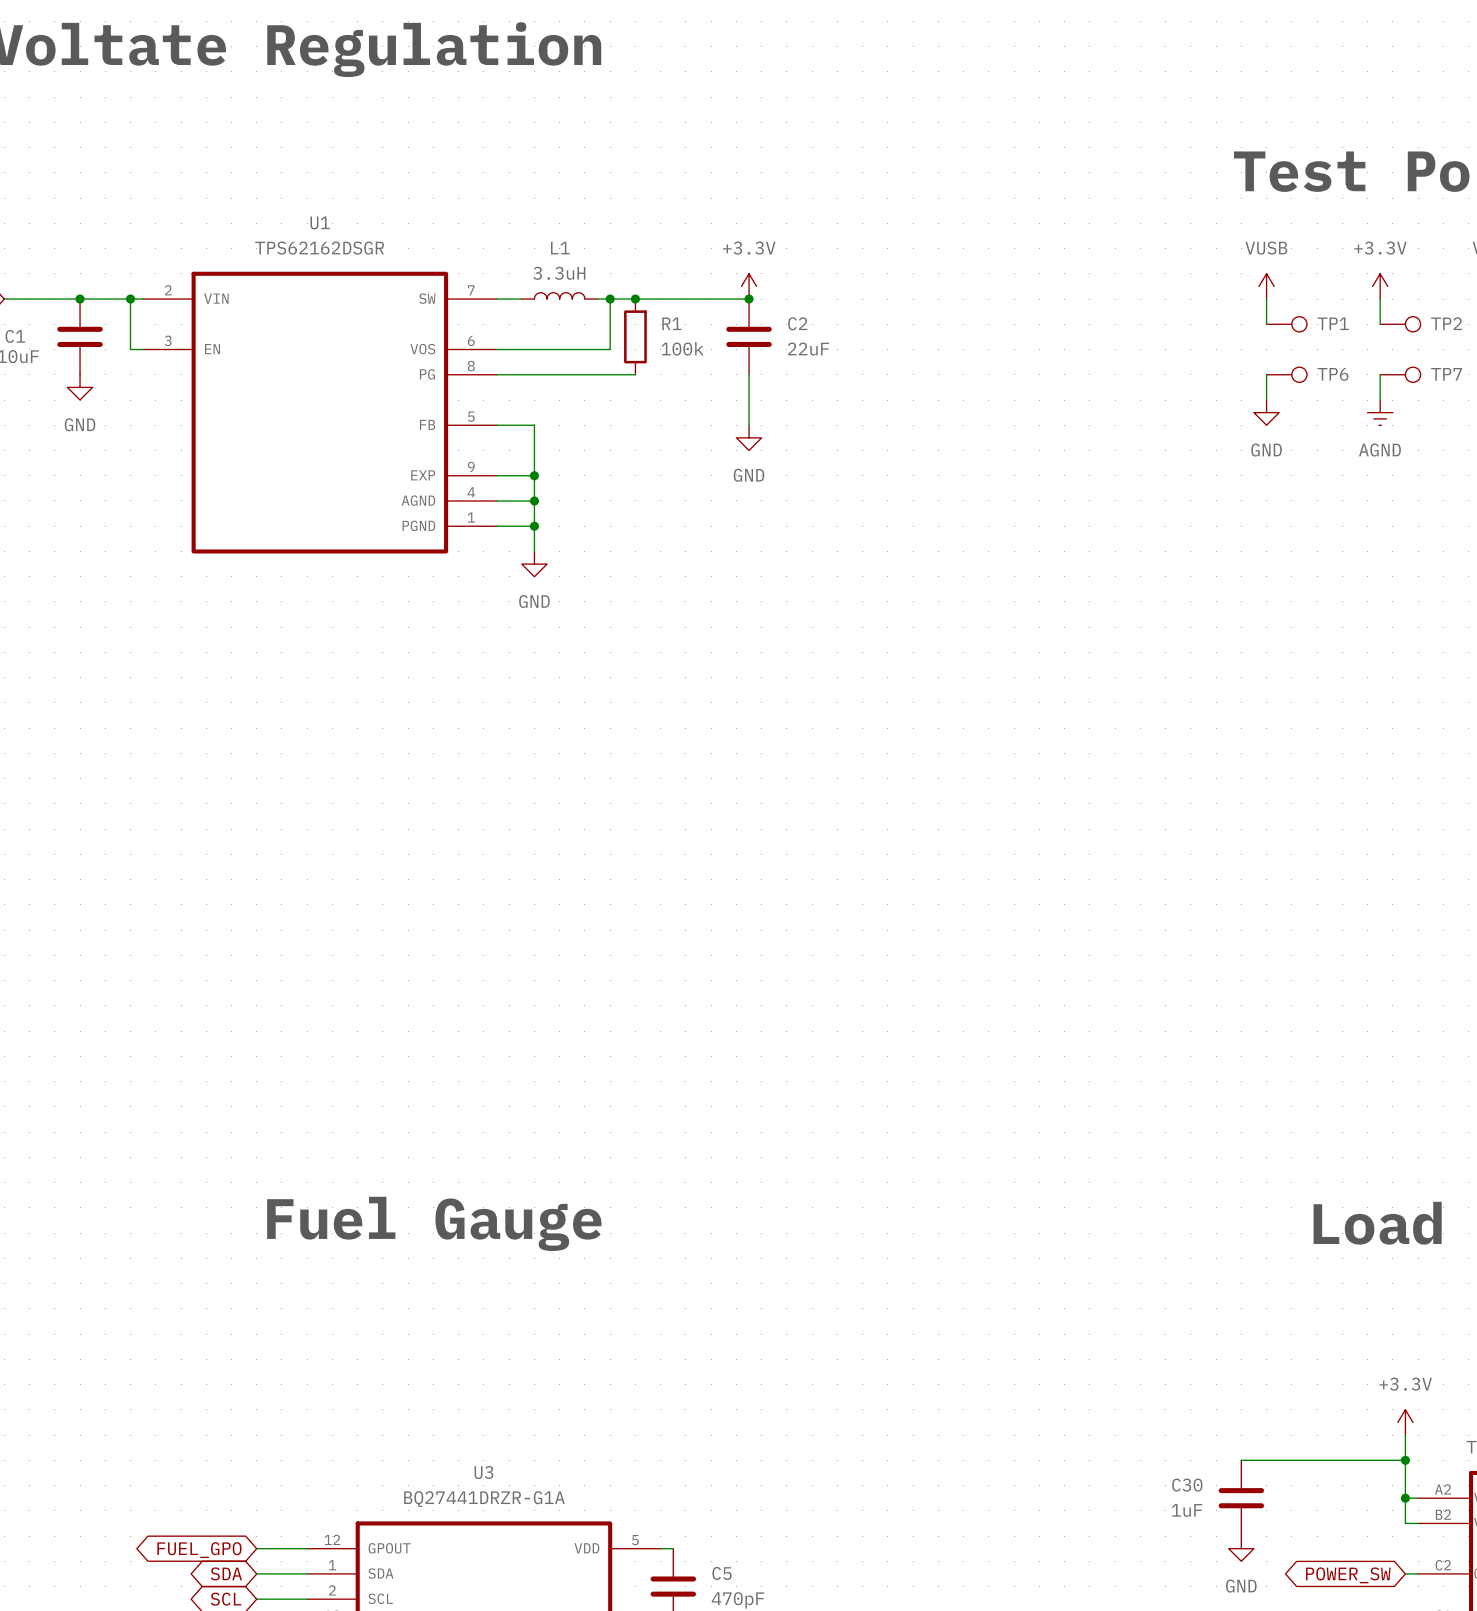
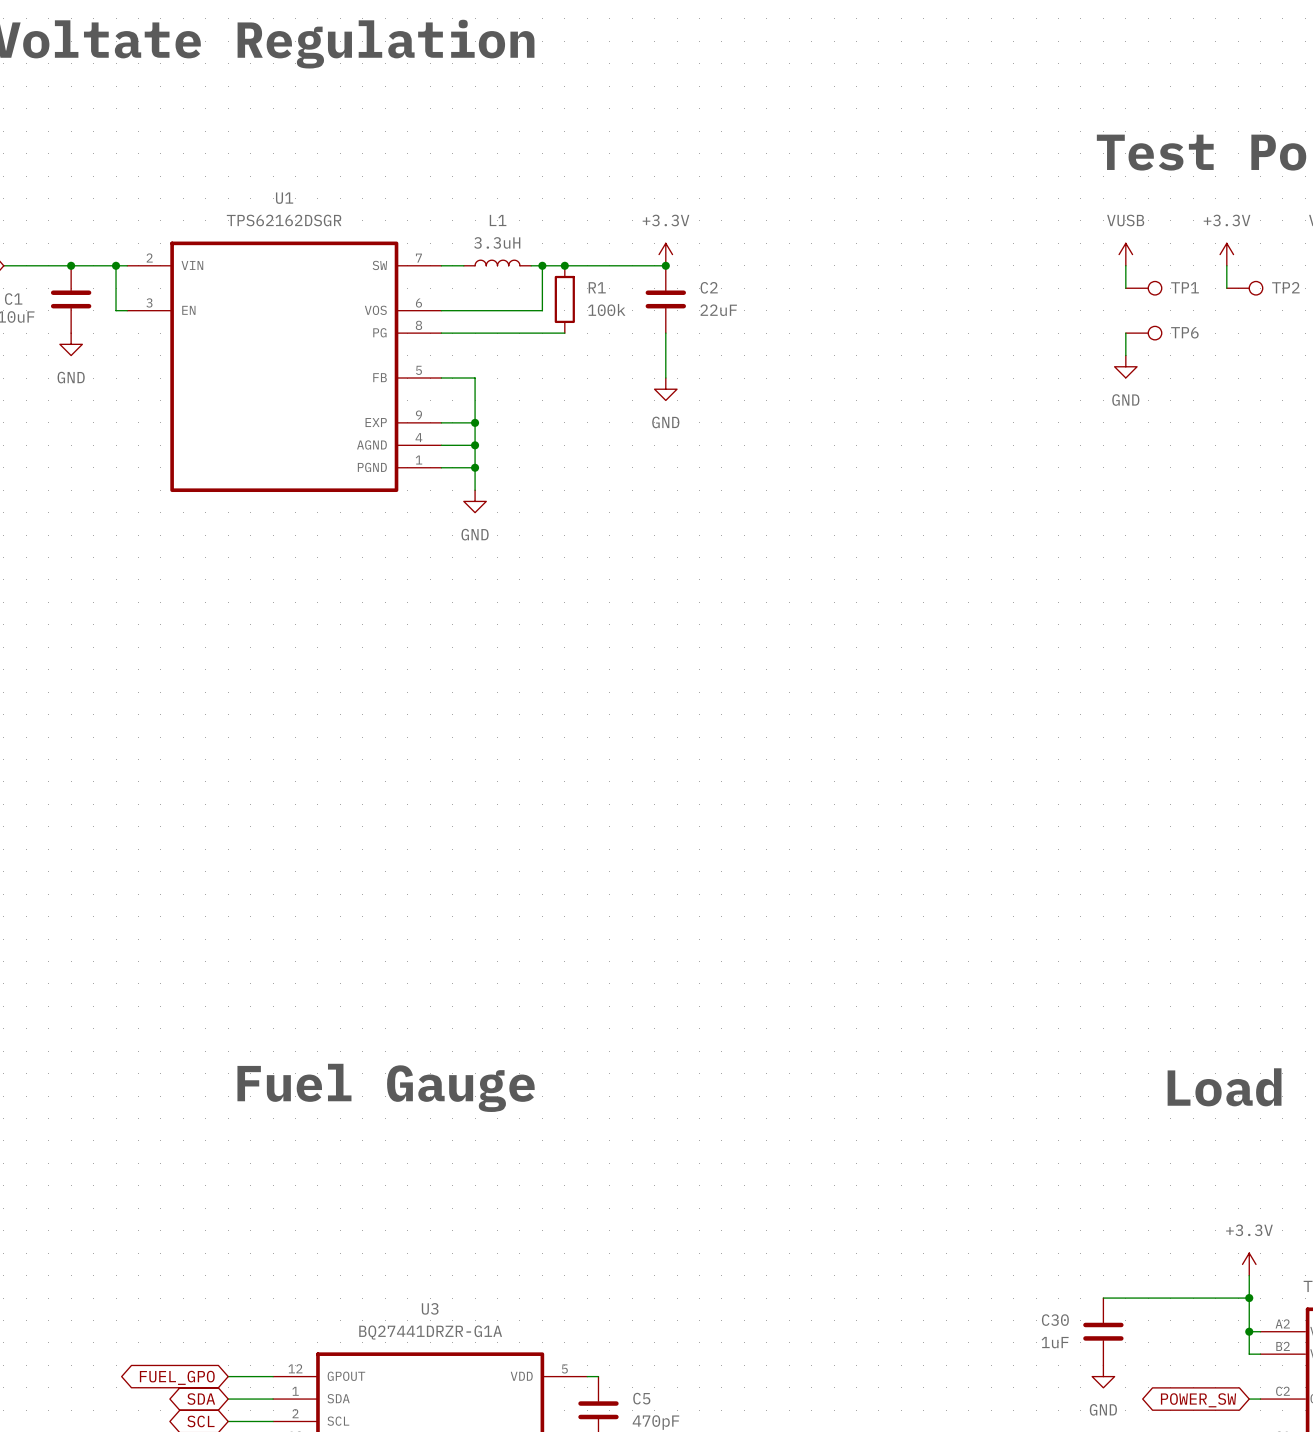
wire: (1380, 374) (1380, 400) -> none
TP7: (1400, 374) -> none
power symbol: AGND (1380, 412) -> none

